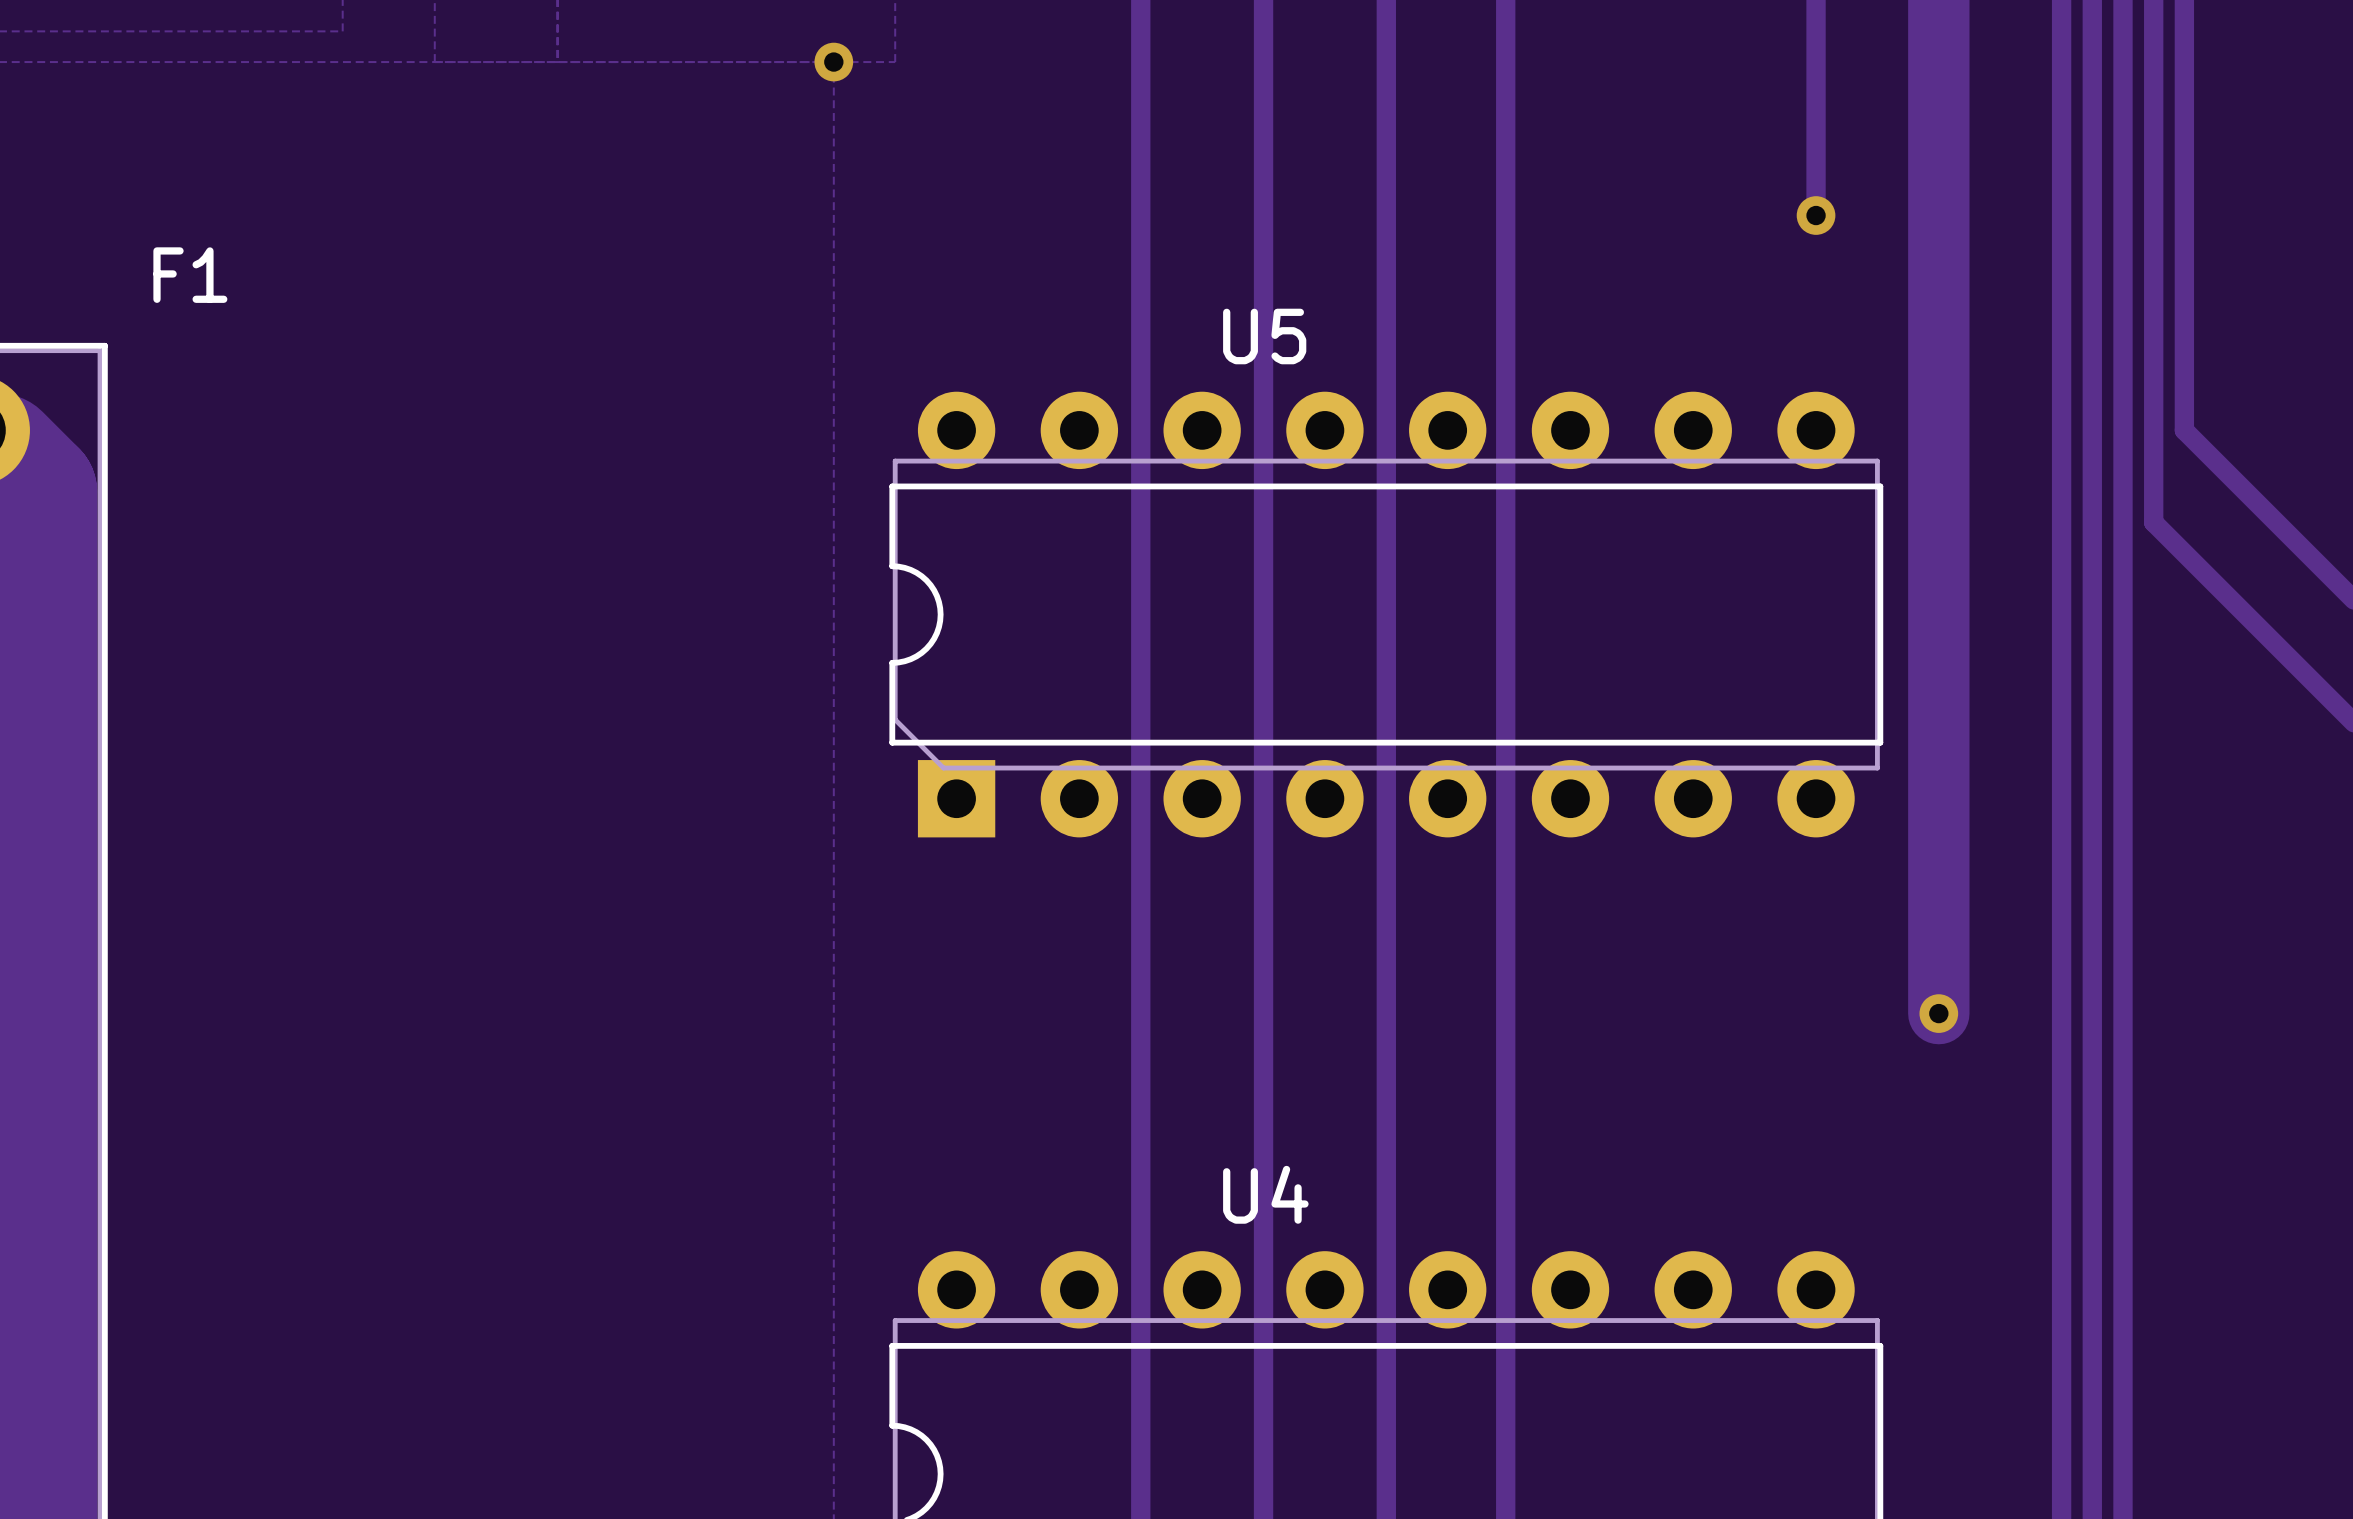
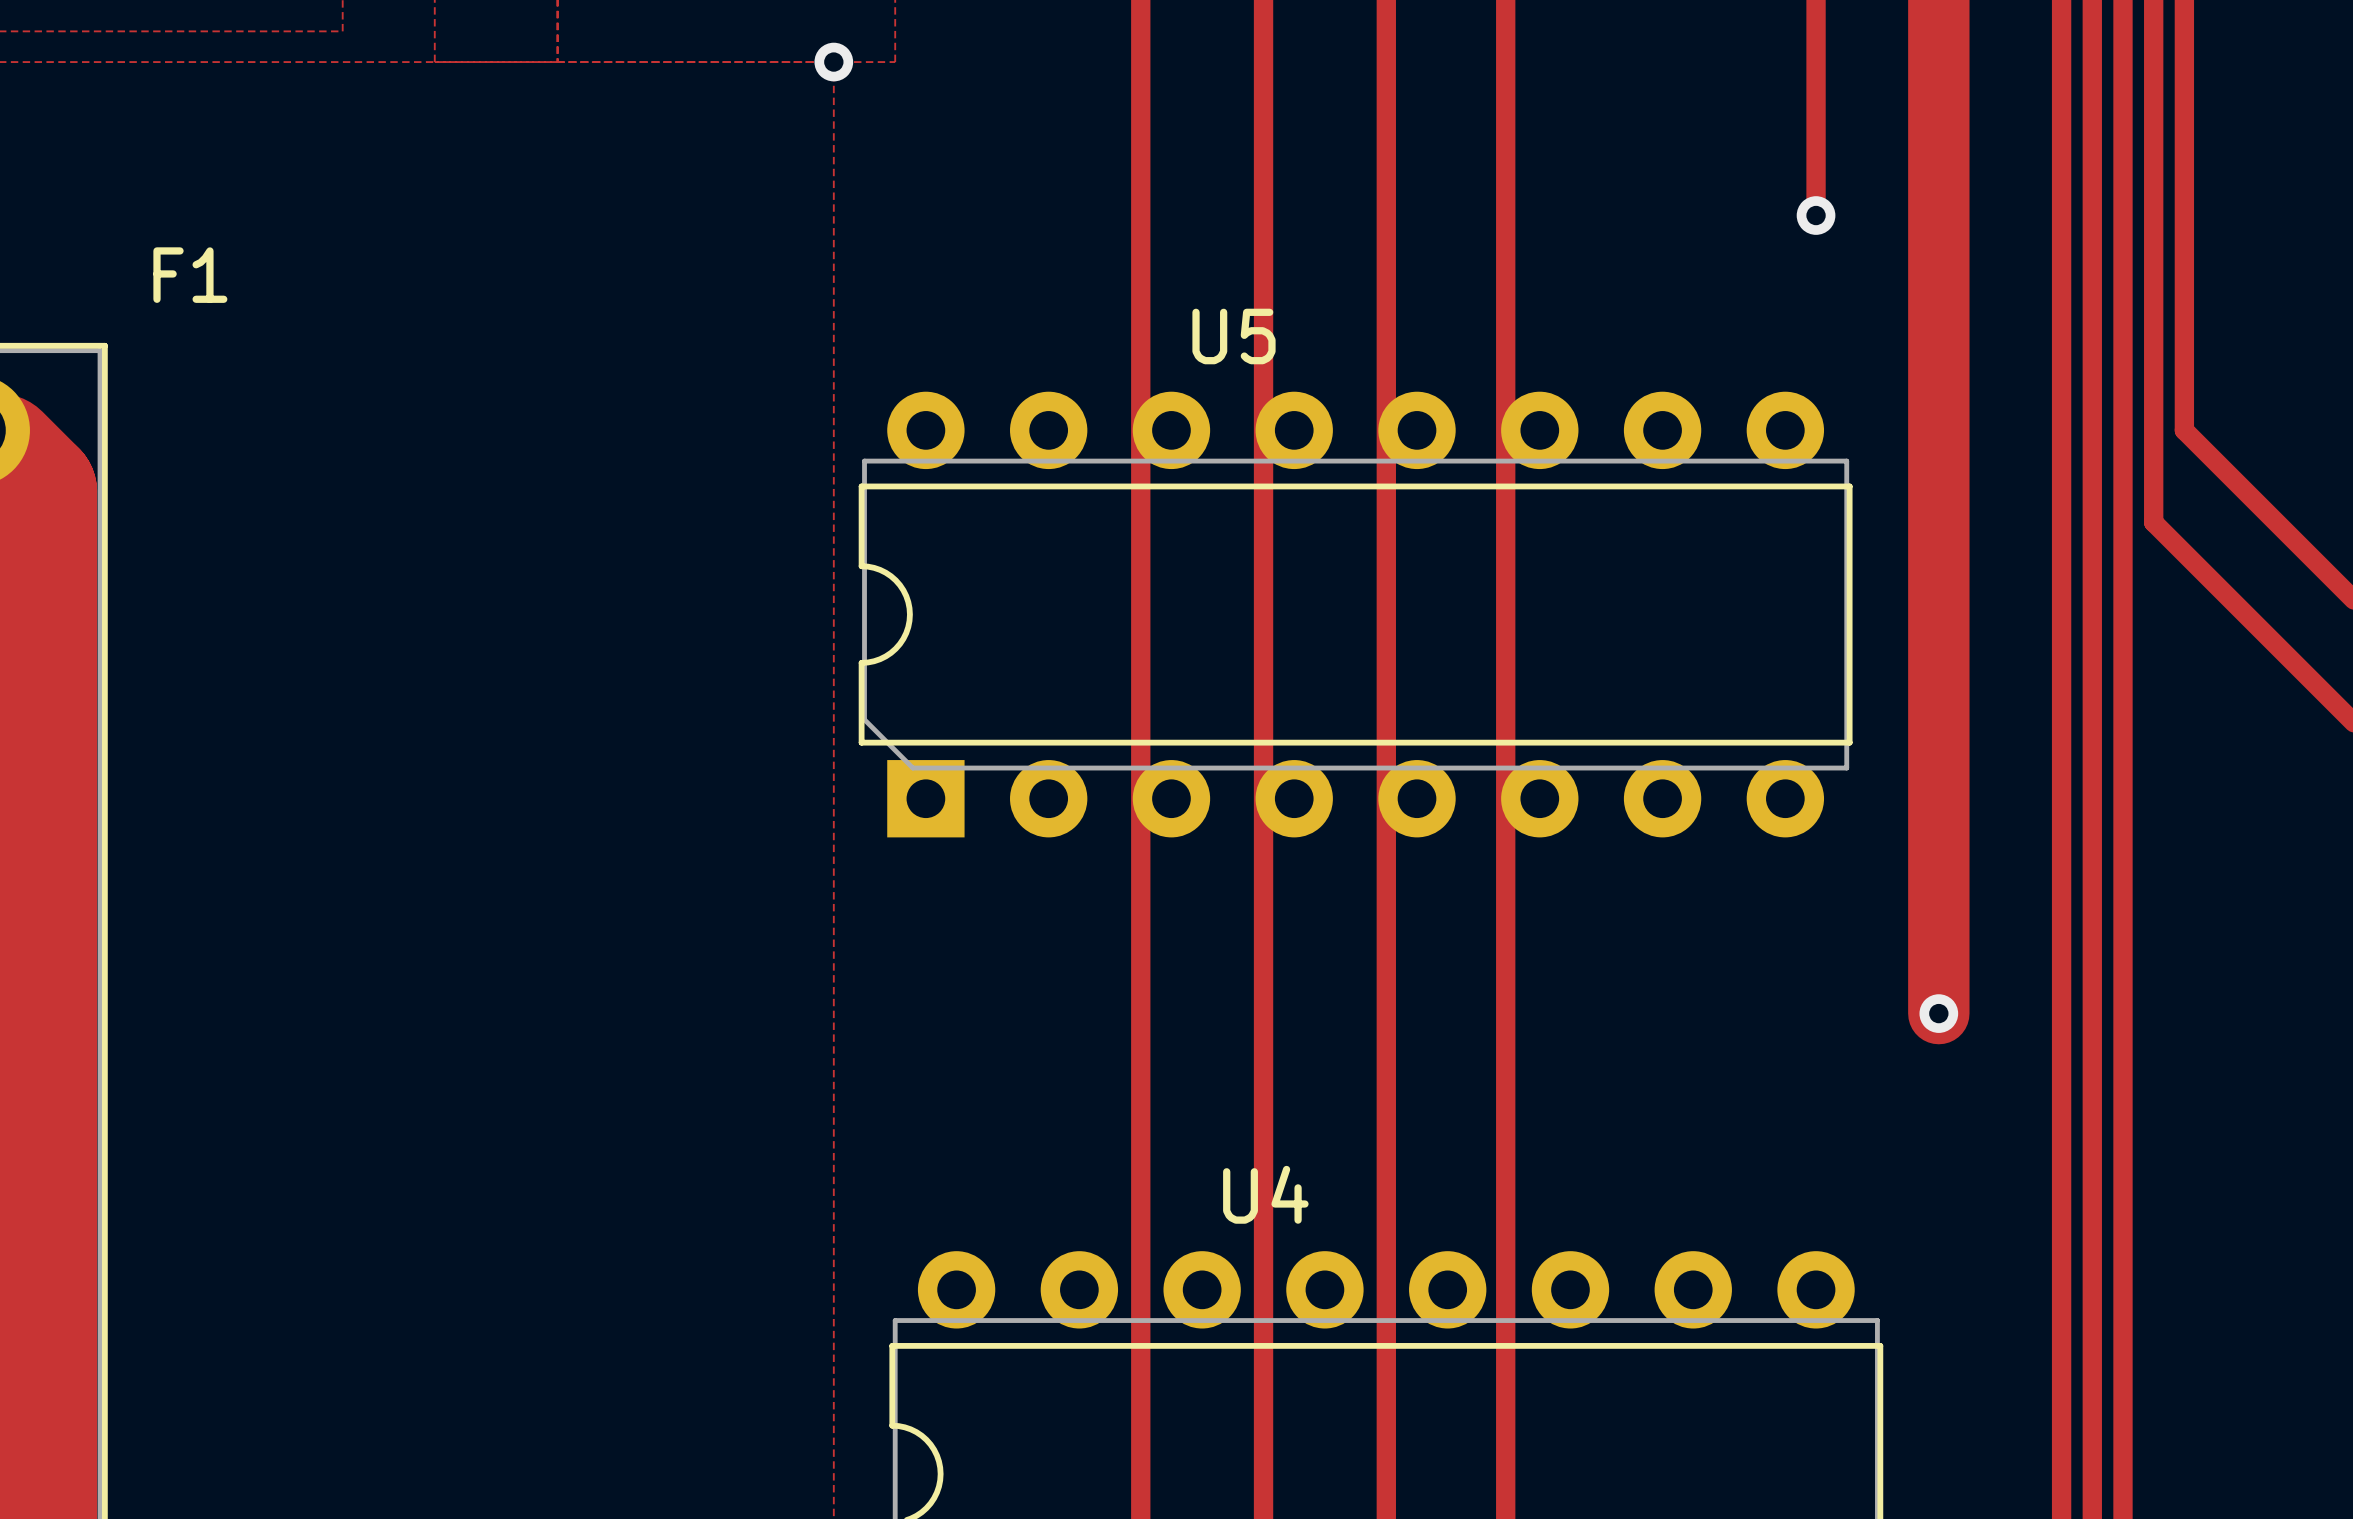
U5 position: (1386, 614) -> (1355, 614)

